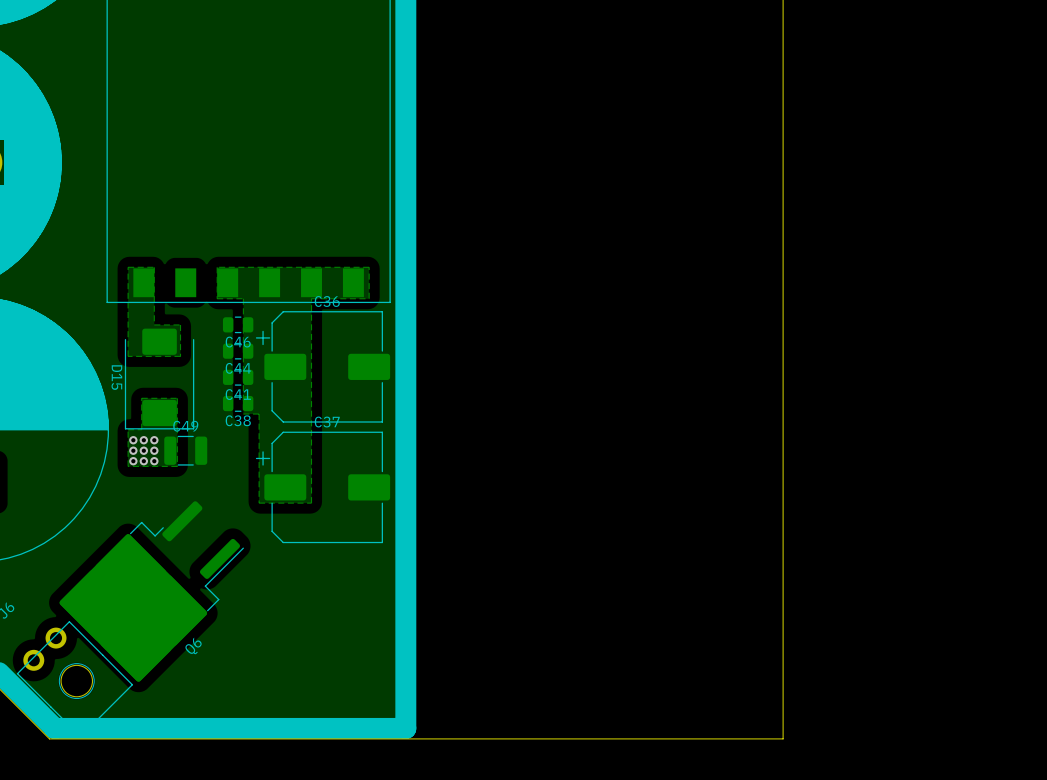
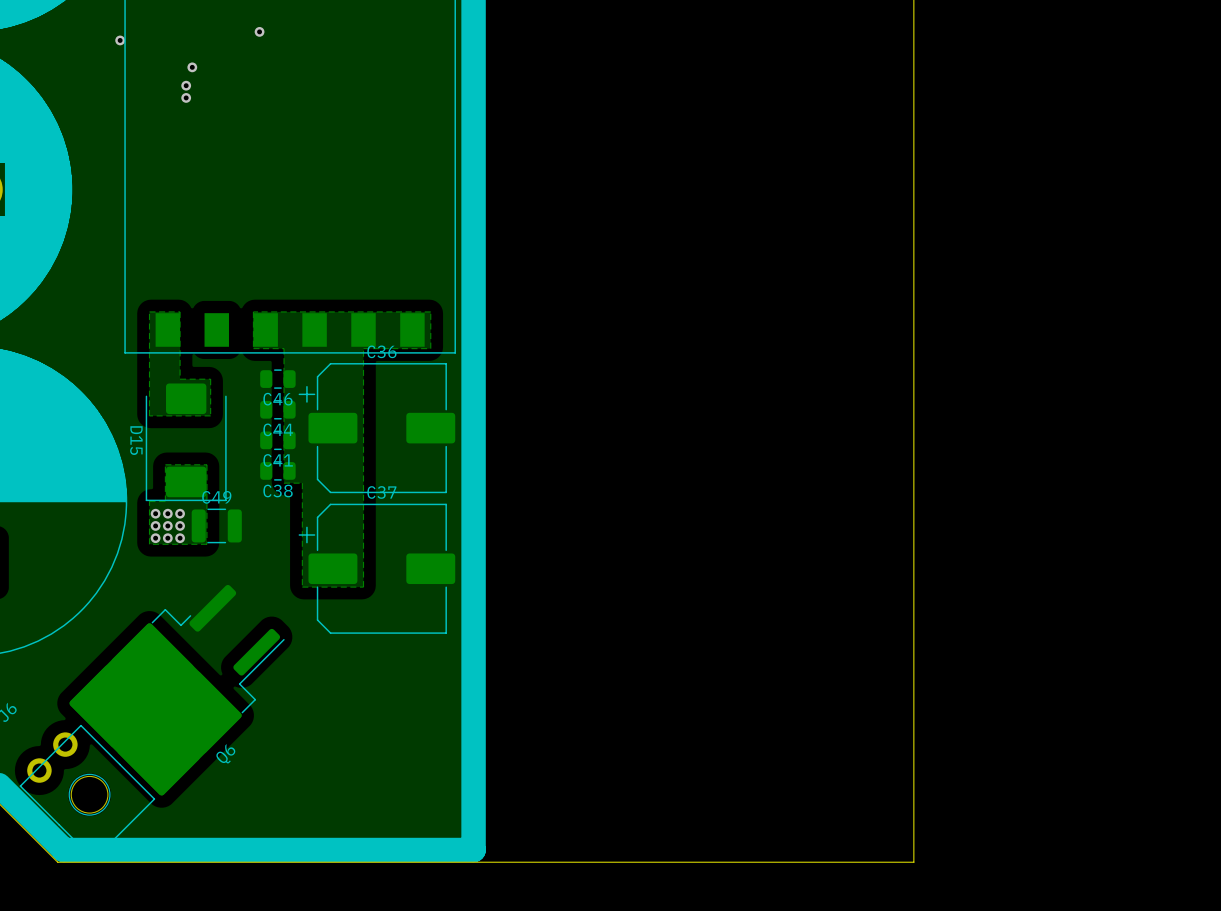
via: none -> (259, 31)
via: none -> (120, 40)
via: none -> (192, 67)
via: none -> (186, 85)
via: none -> (186, 97)

